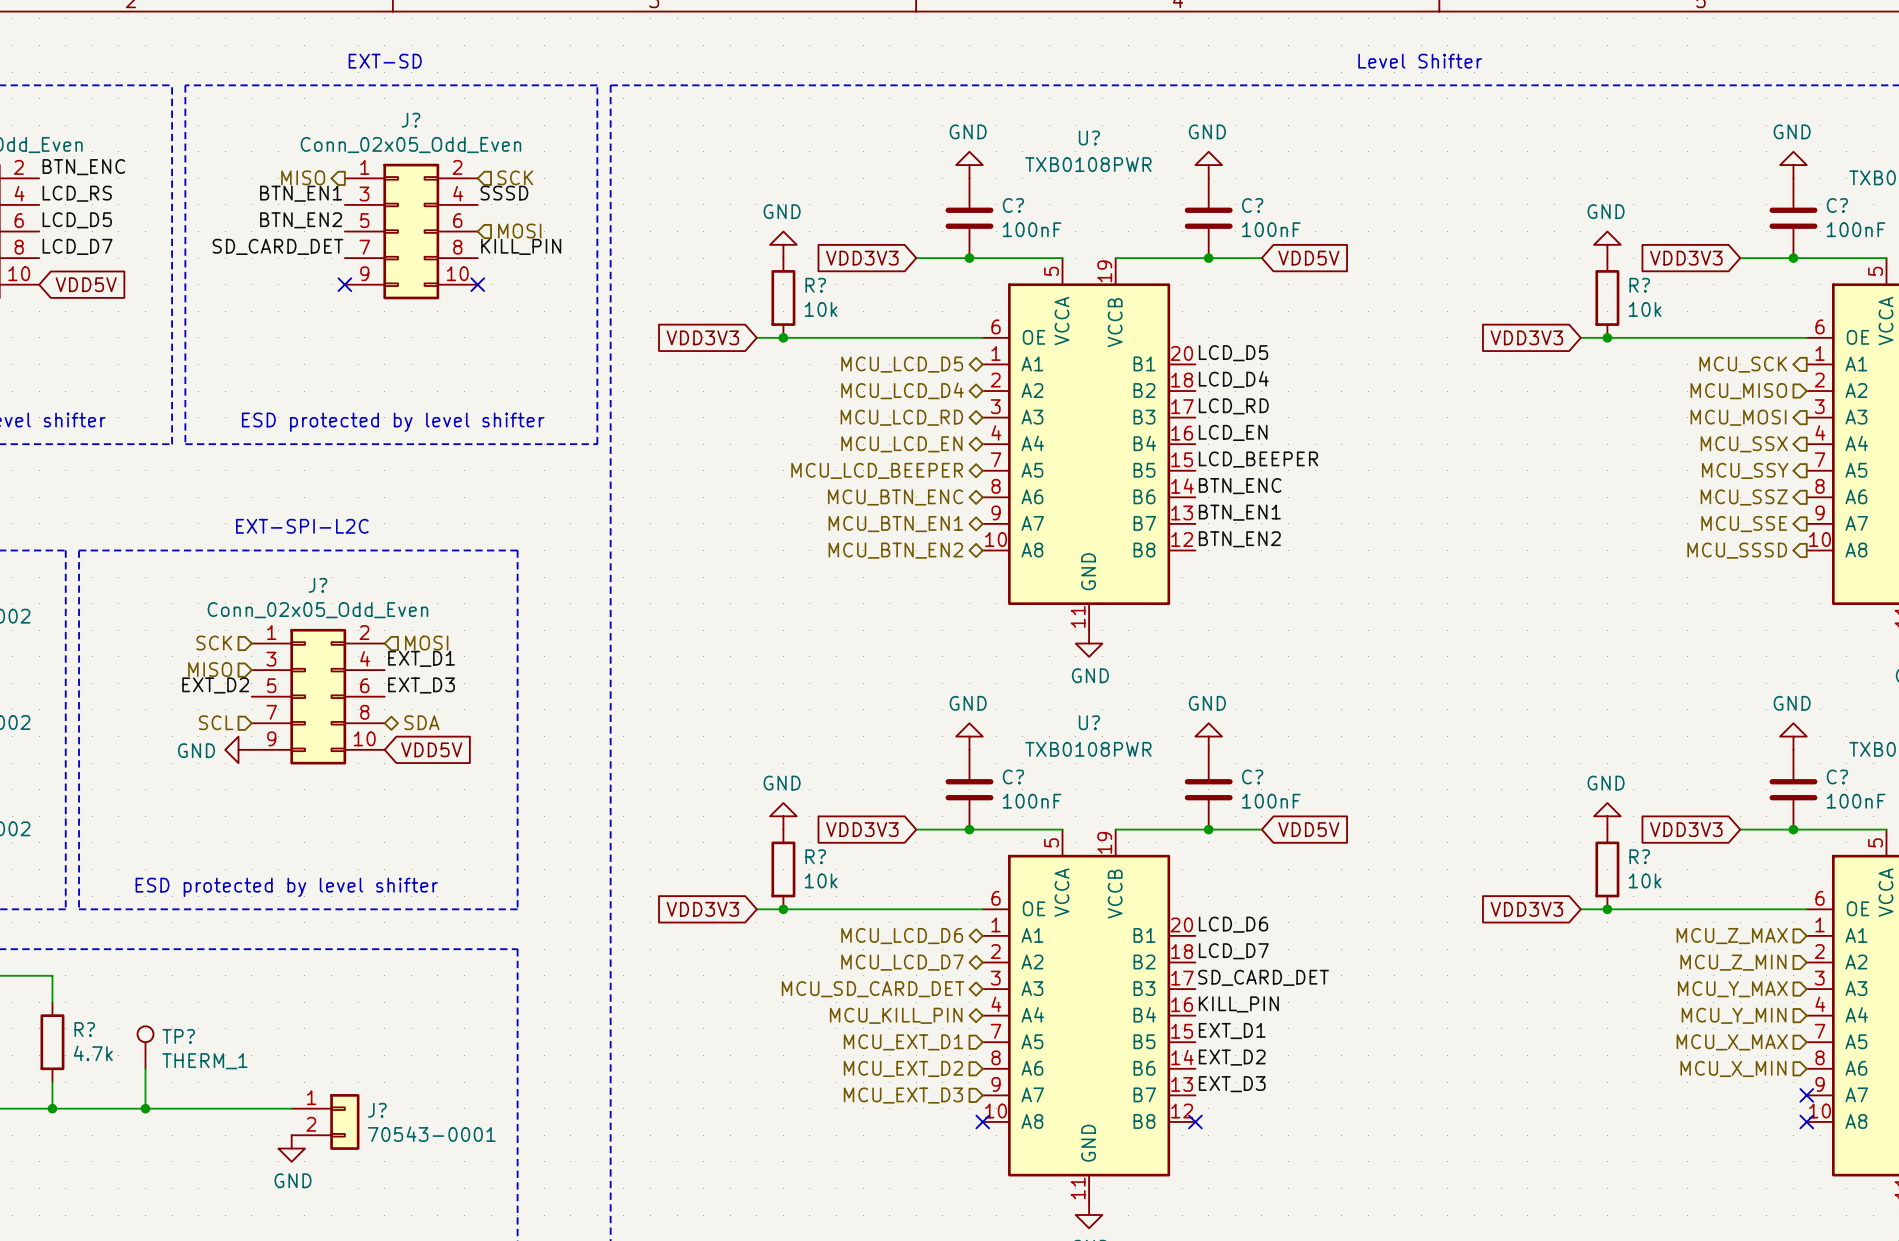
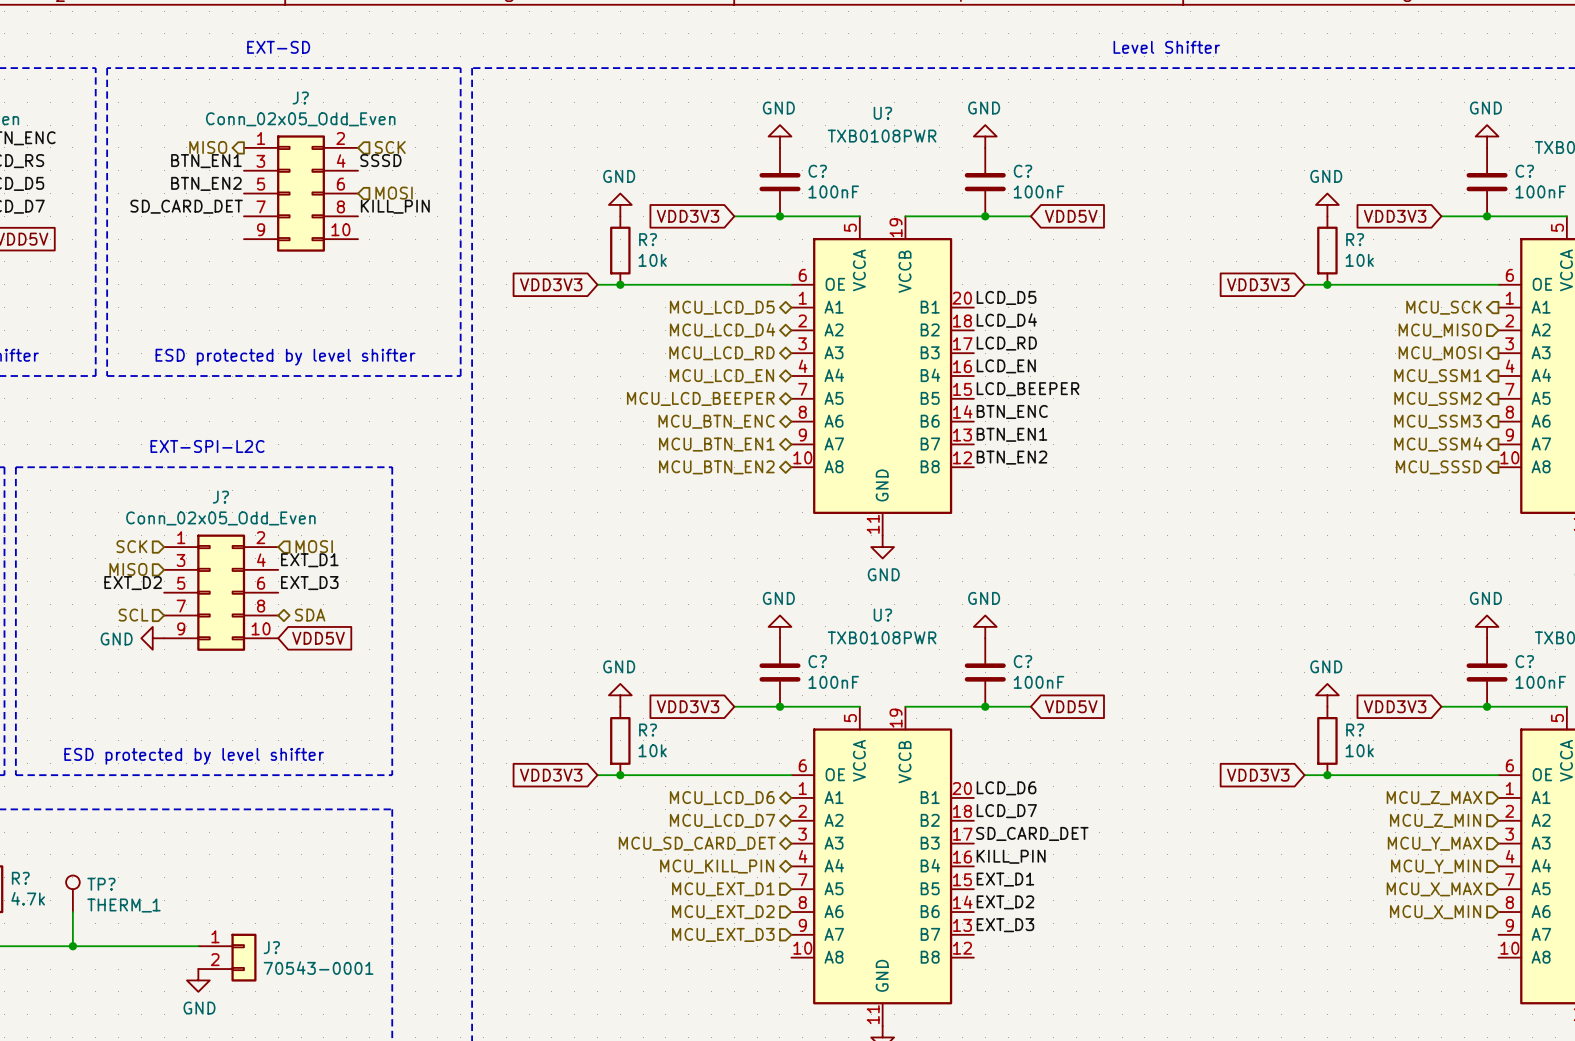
no-connect mark: (344, 284) -> none
no-connect mark: (477, 284) -> none
hierarchical label: MCU_SSX (1744, 444) -> MCU_SSM1 (1438, 376)
hierarchical label: MCU_SSY (1745, 470) -> MCU_SSM2 (1438, 398)
hierarchical label: MCU_SSZ (1744, 497) -> MCU_SSM3 (1438, 421)
hierarchical label: MCU_SSE (1744, 524) -> MCU_SSM4 (1438, 444)
no-connect mark: (1806, 1095) -> none
no-connect mark: (982, 1121) -> none
no-connect mark: (1195, 1121) -> none
no-connect mark: (1806, 1121) -> none

